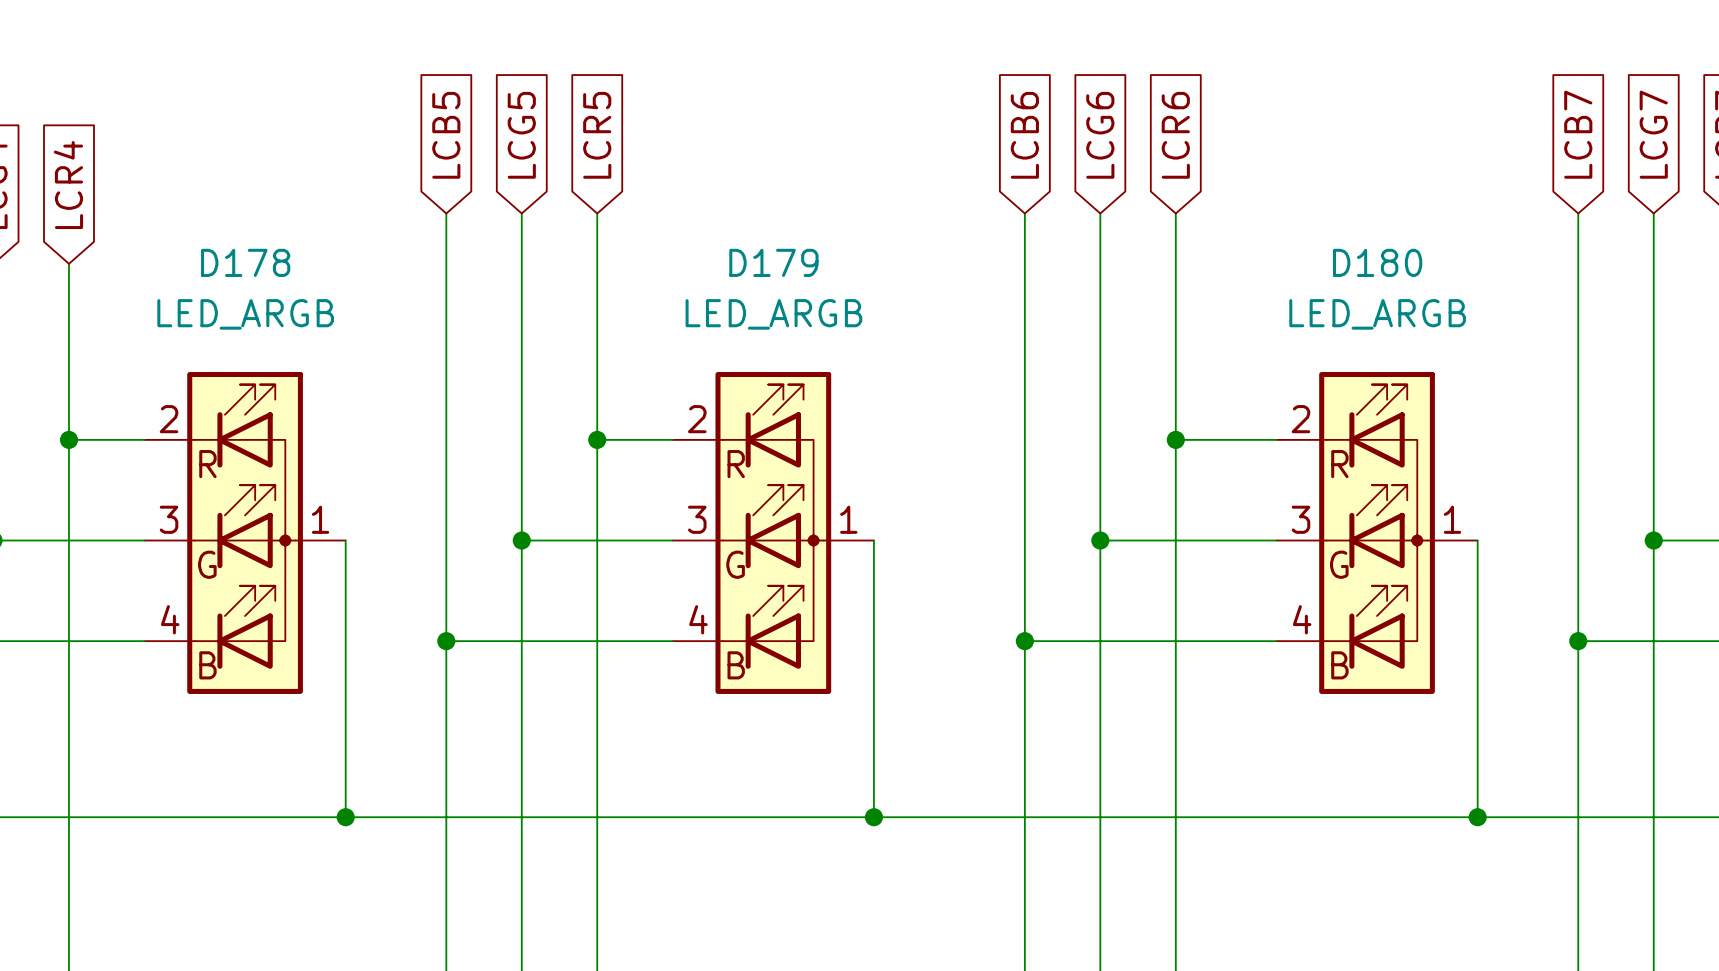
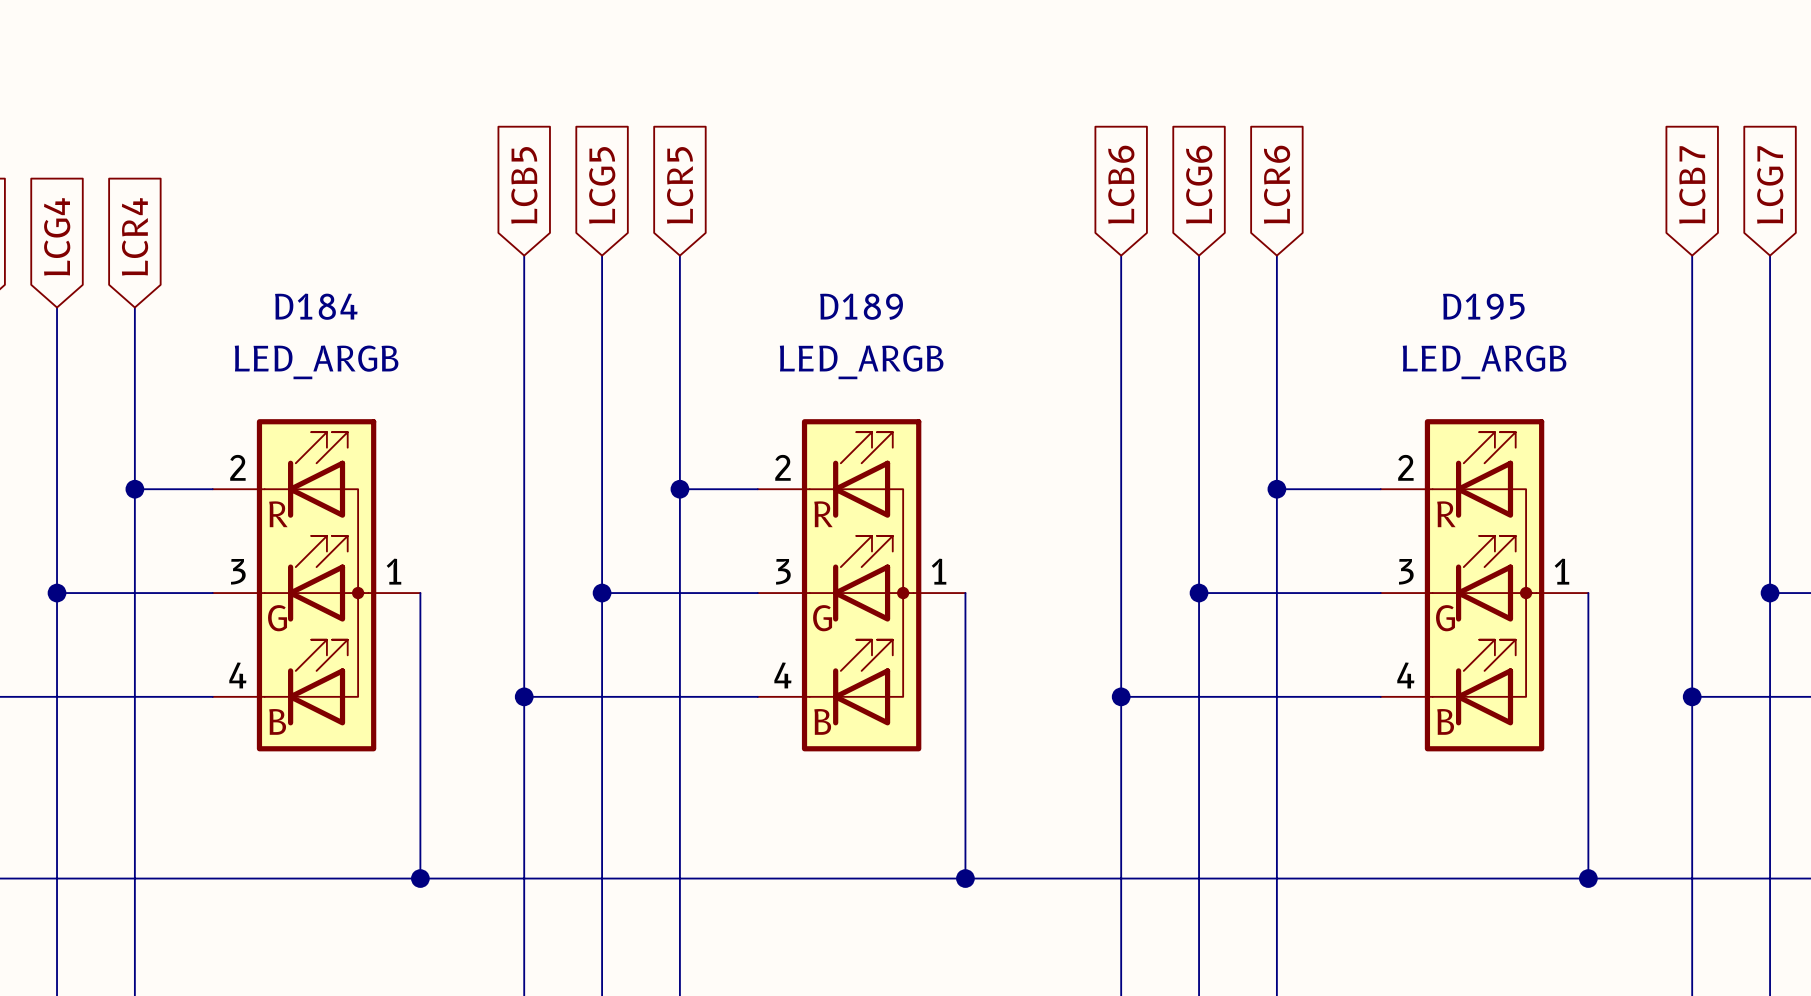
D178 name: D178 (245, 262) -> D184 (316, 306)
D179 name: D179 (773, 262) -> D189 (861, 306)
D180 name: D180 (1377, 262) -> D195 (1483, 306)

